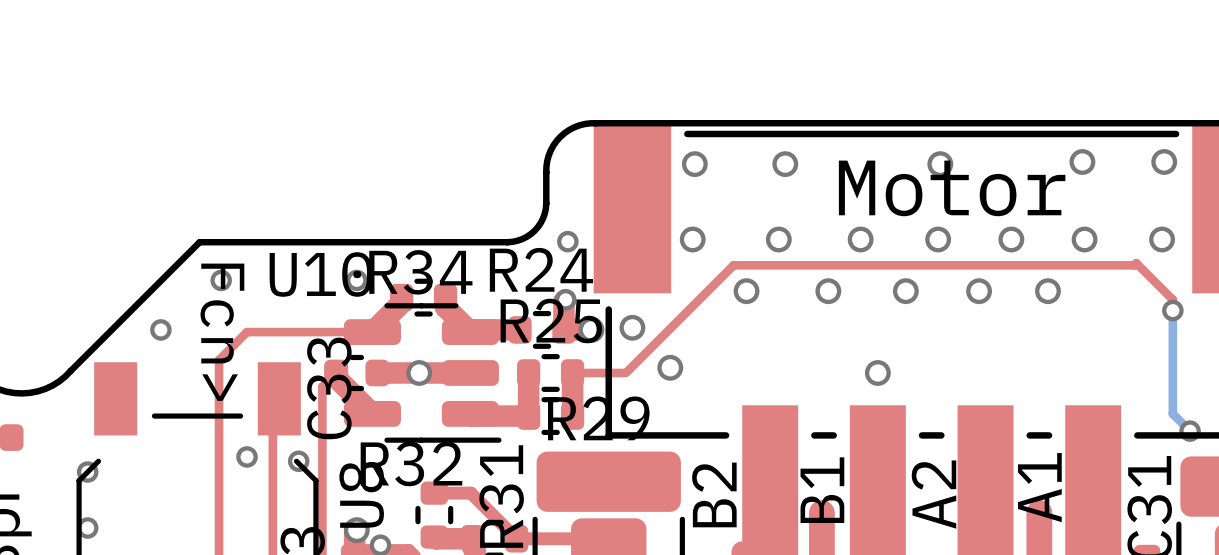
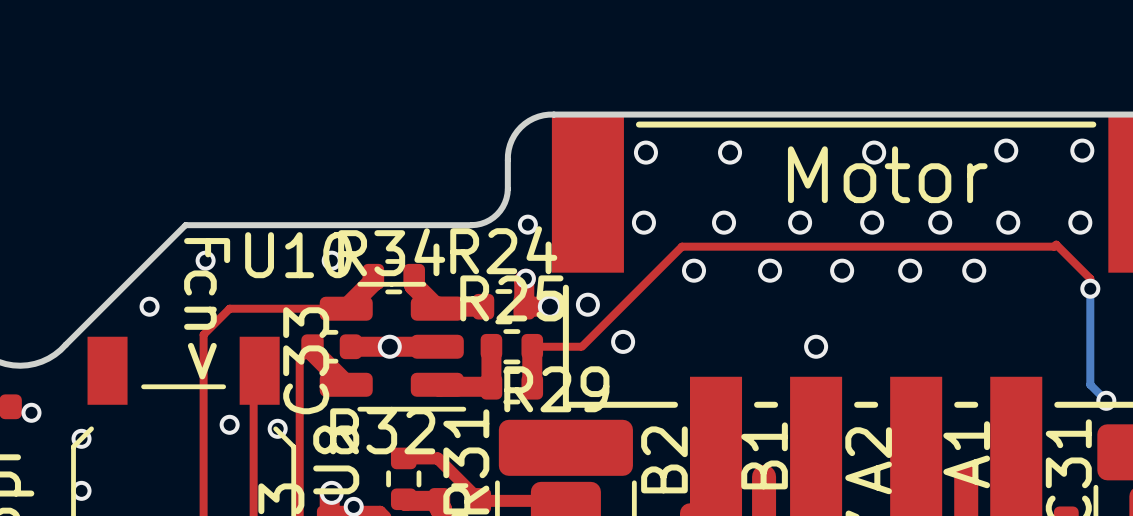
via: none -> (31, 412)

